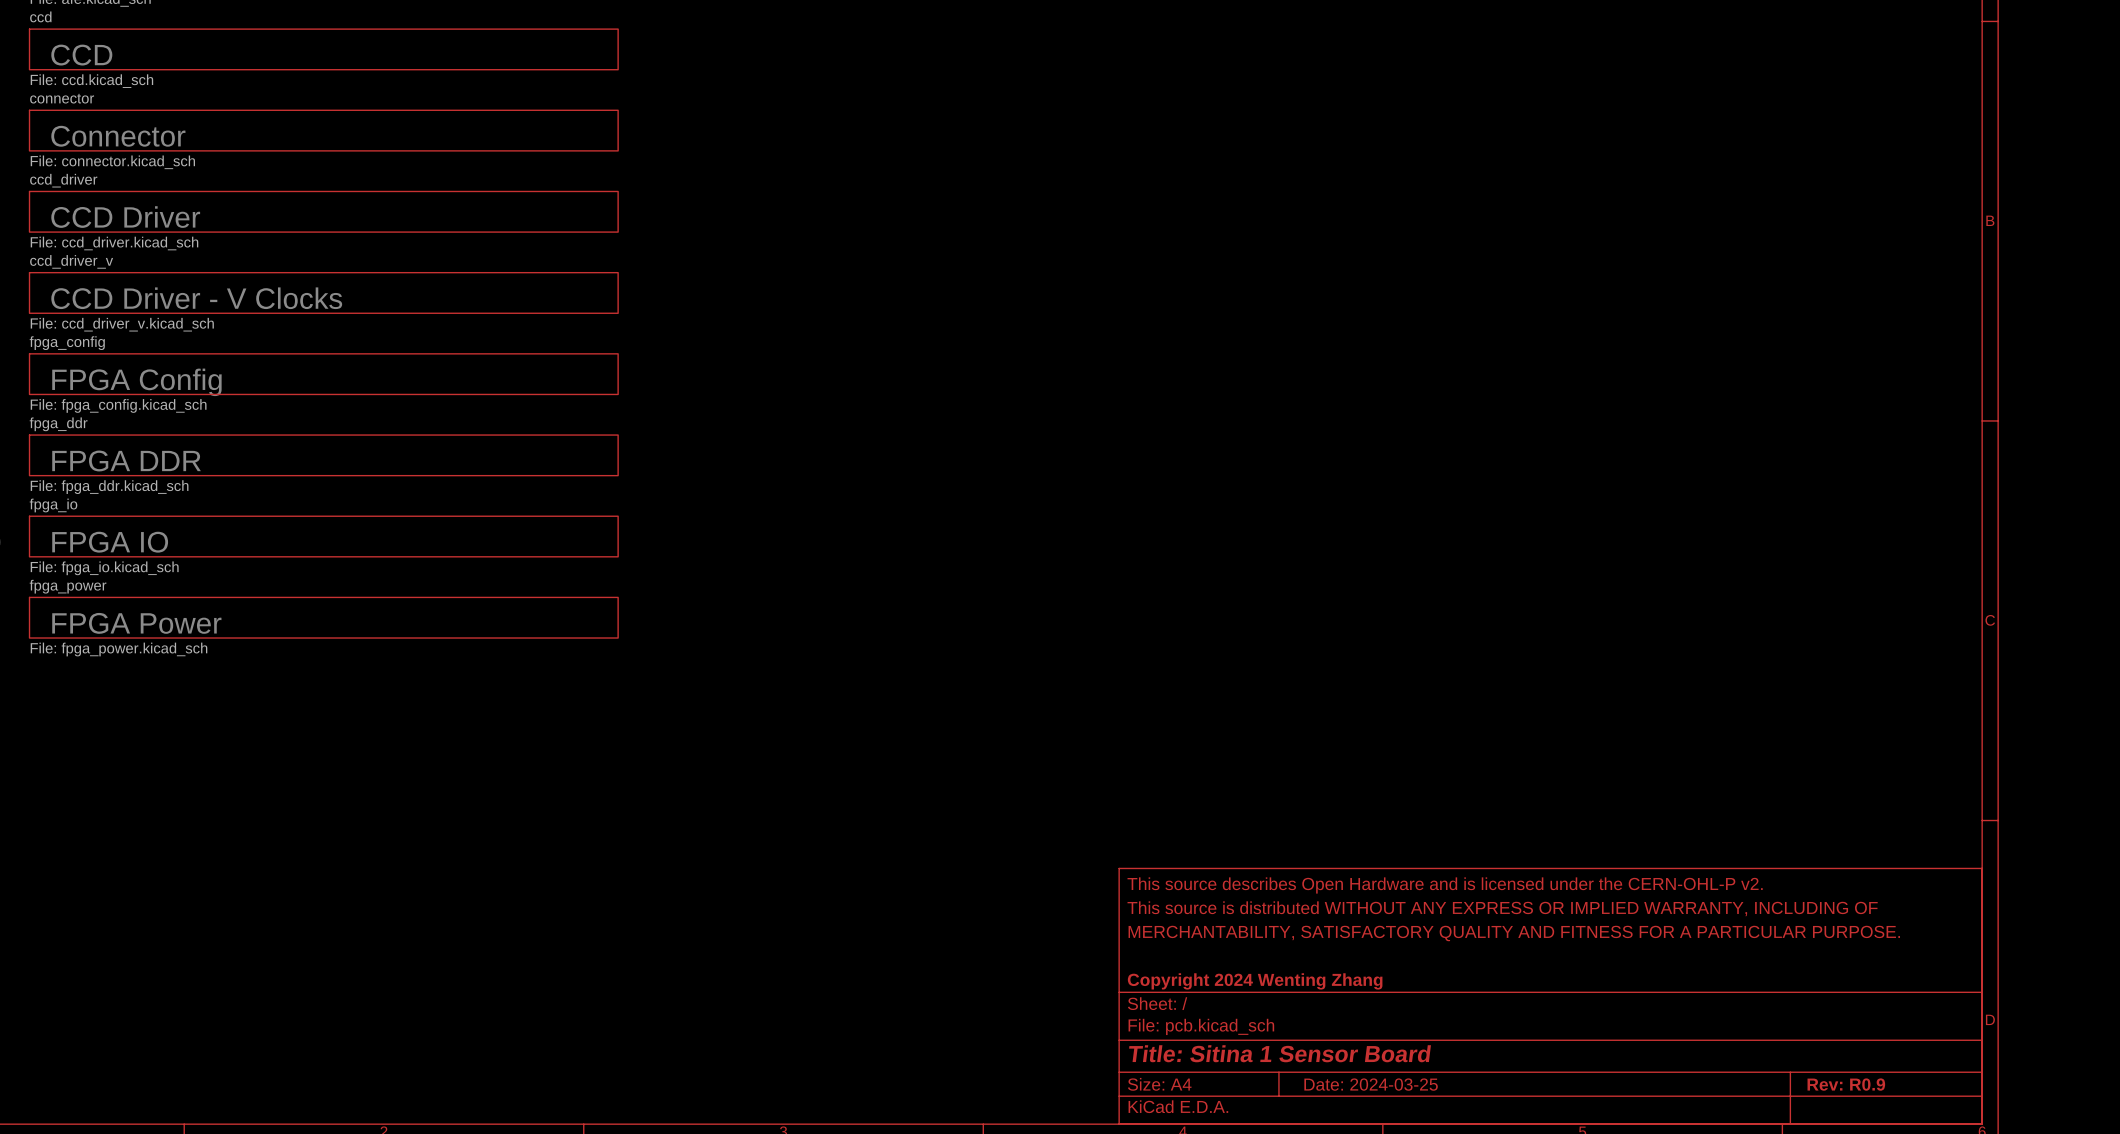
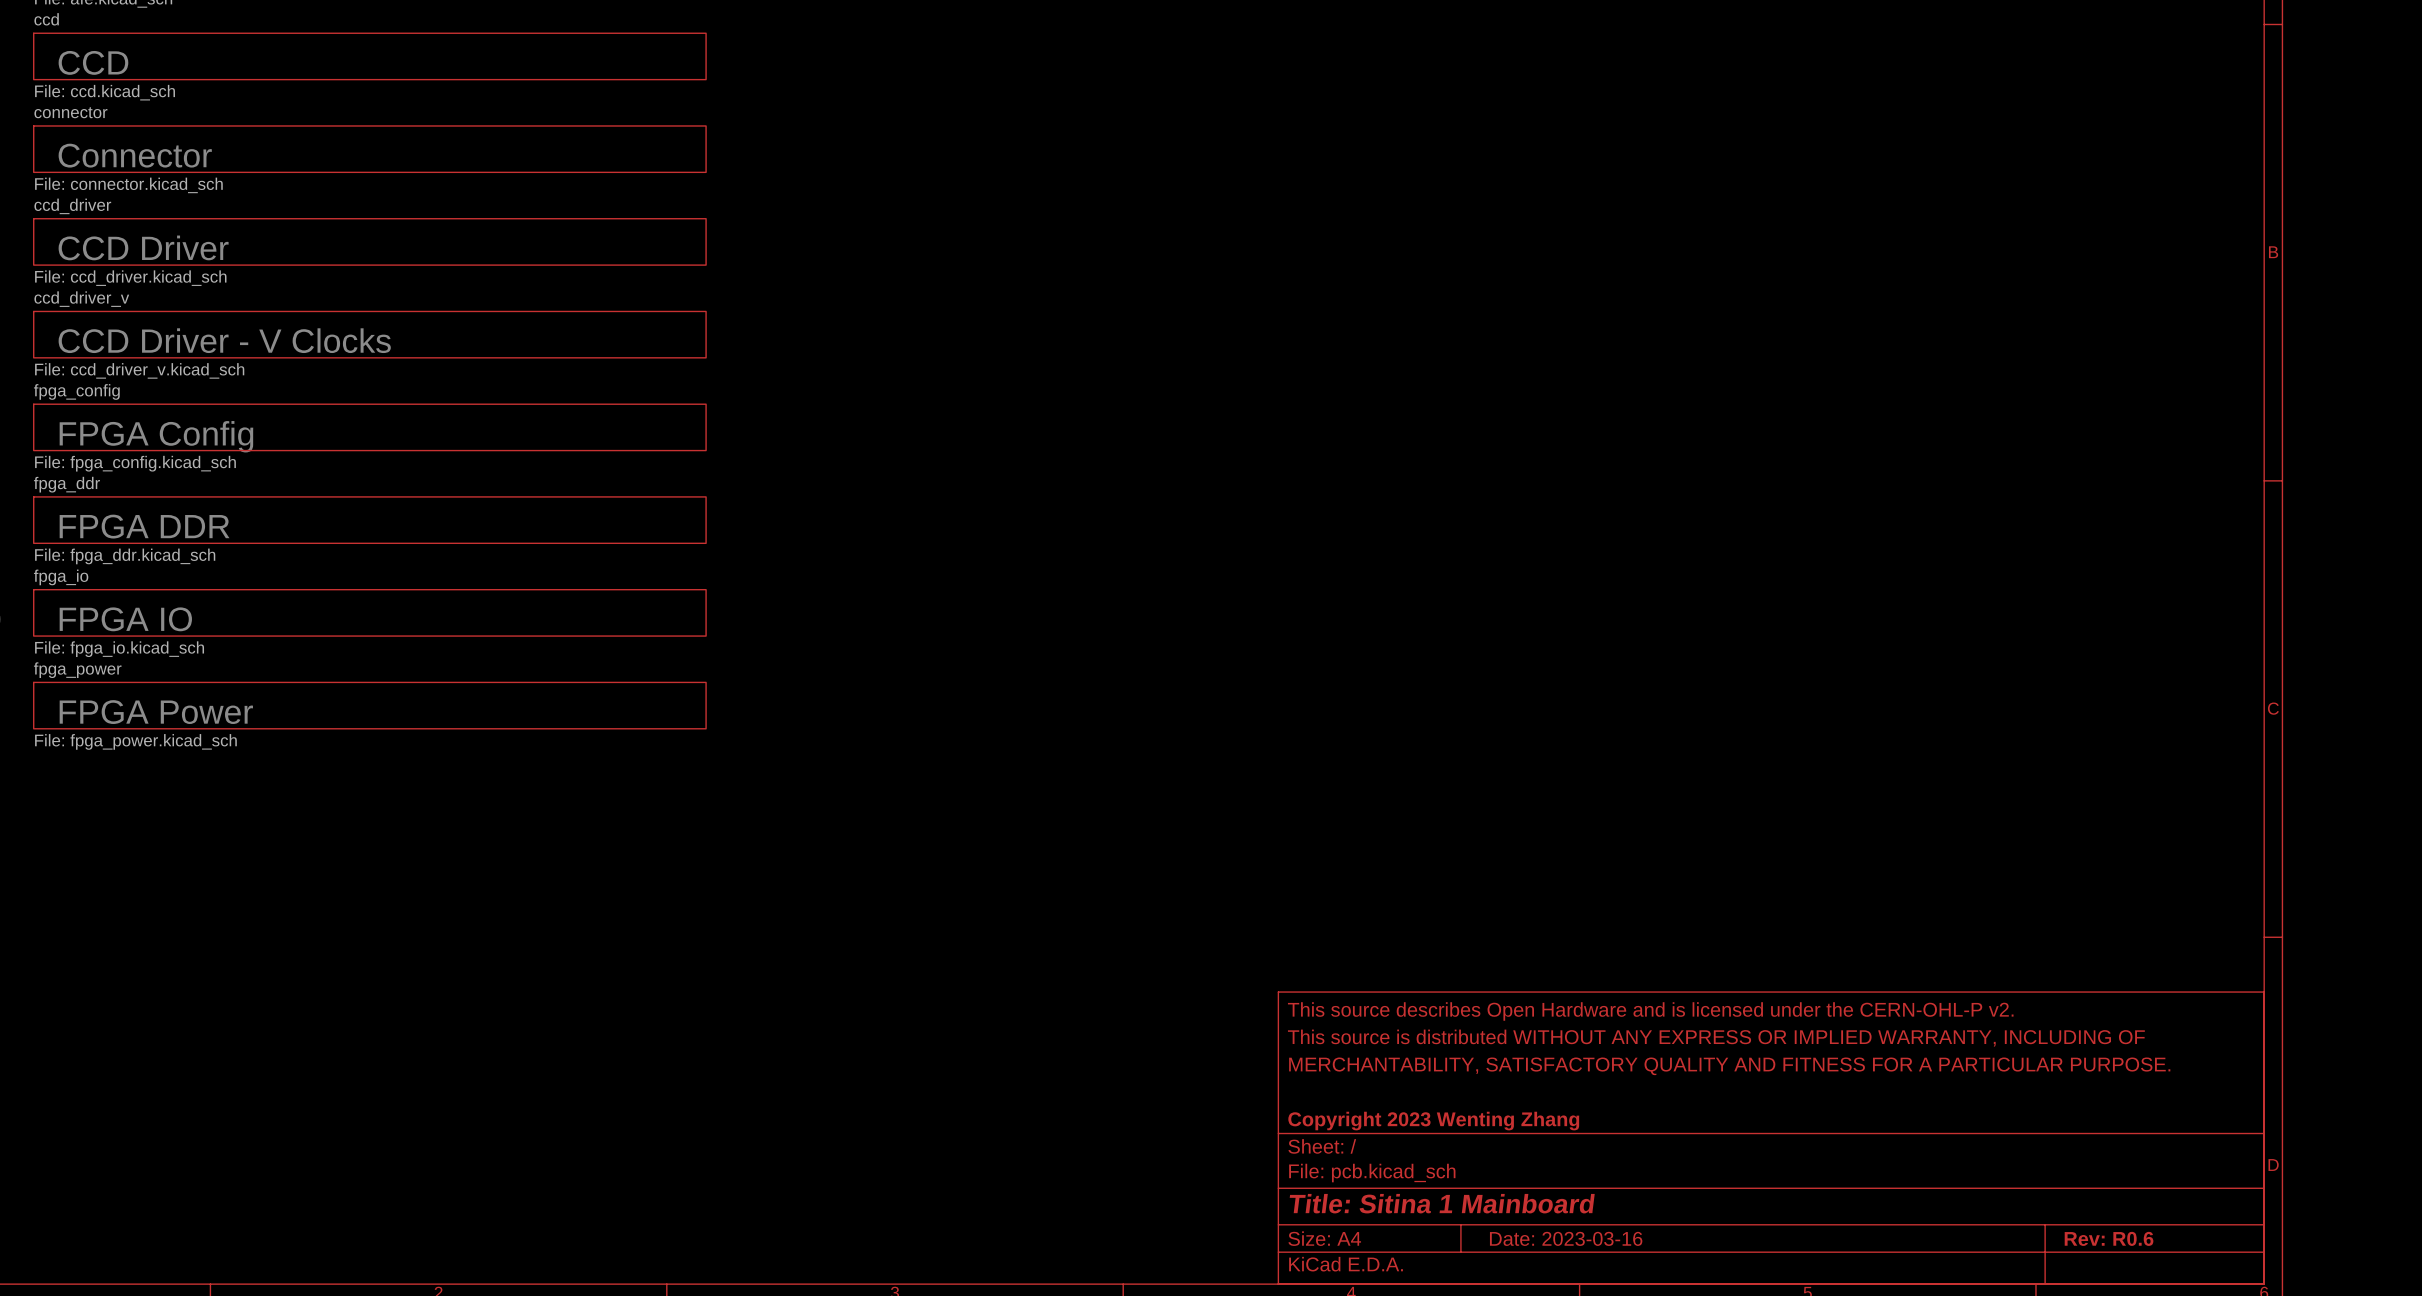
title block: Copyright 2024 Wenting Zhang (1255, 981) -> Copyright 2023 Wenting Zhang (1433, 1121)
title block: Title: Sitina 1 Sensor Board (1280, 1053) -> Title: Sitina 1 Mainboard (1442, 1203)
title block: Date: 2024-03-25 (1371, 1084) -> Date: 2023-03-16 (1566, 1238)
title block: Rev: R0.9 (1846, 1084) -> Rev: R0.6 (2109, 1238)

